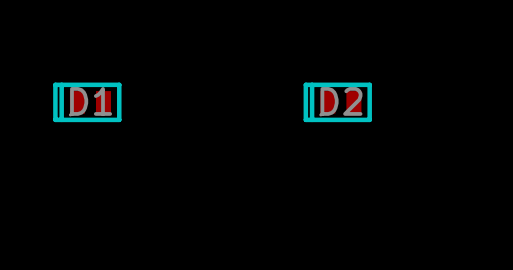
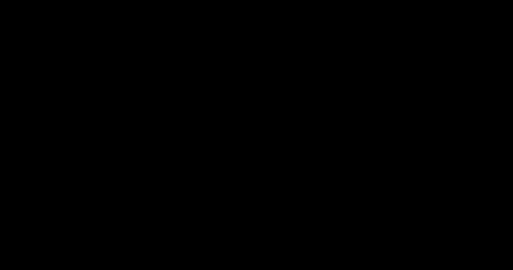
D1: (87, 102) -> none
D2: (337, 102) -> none

